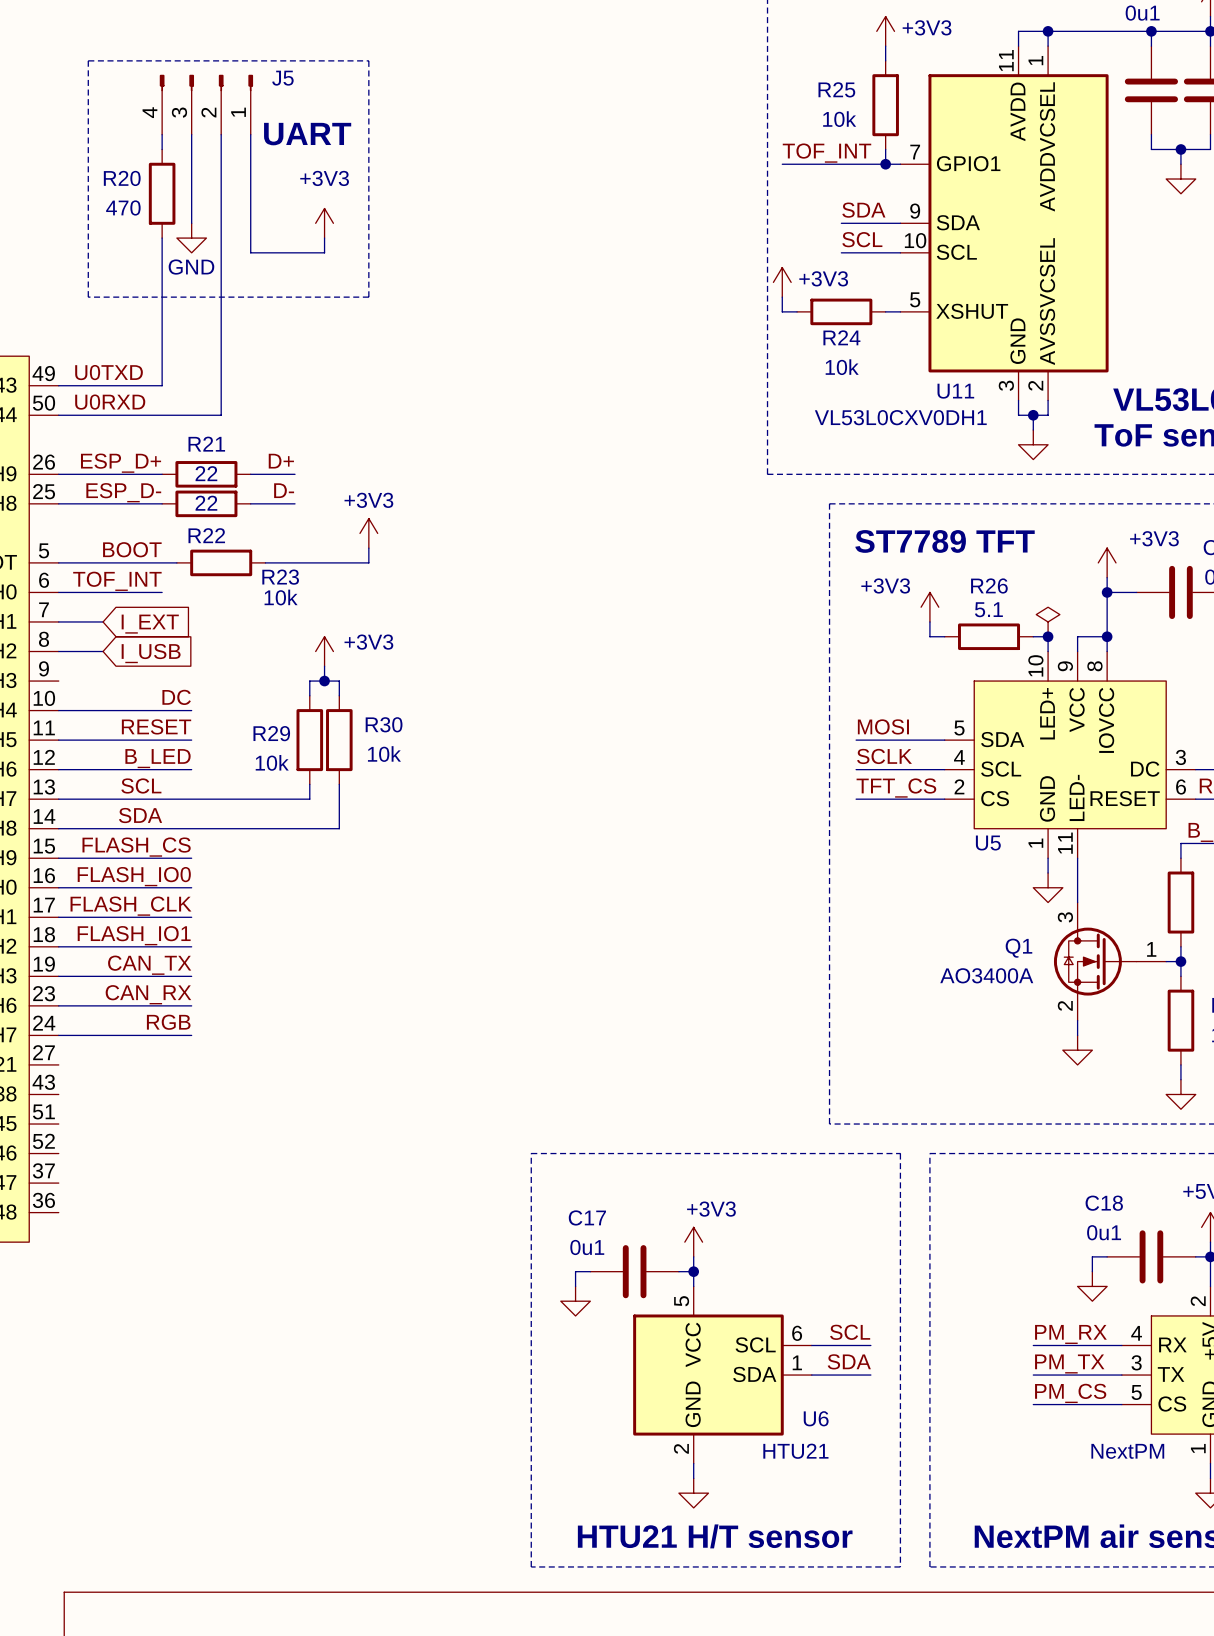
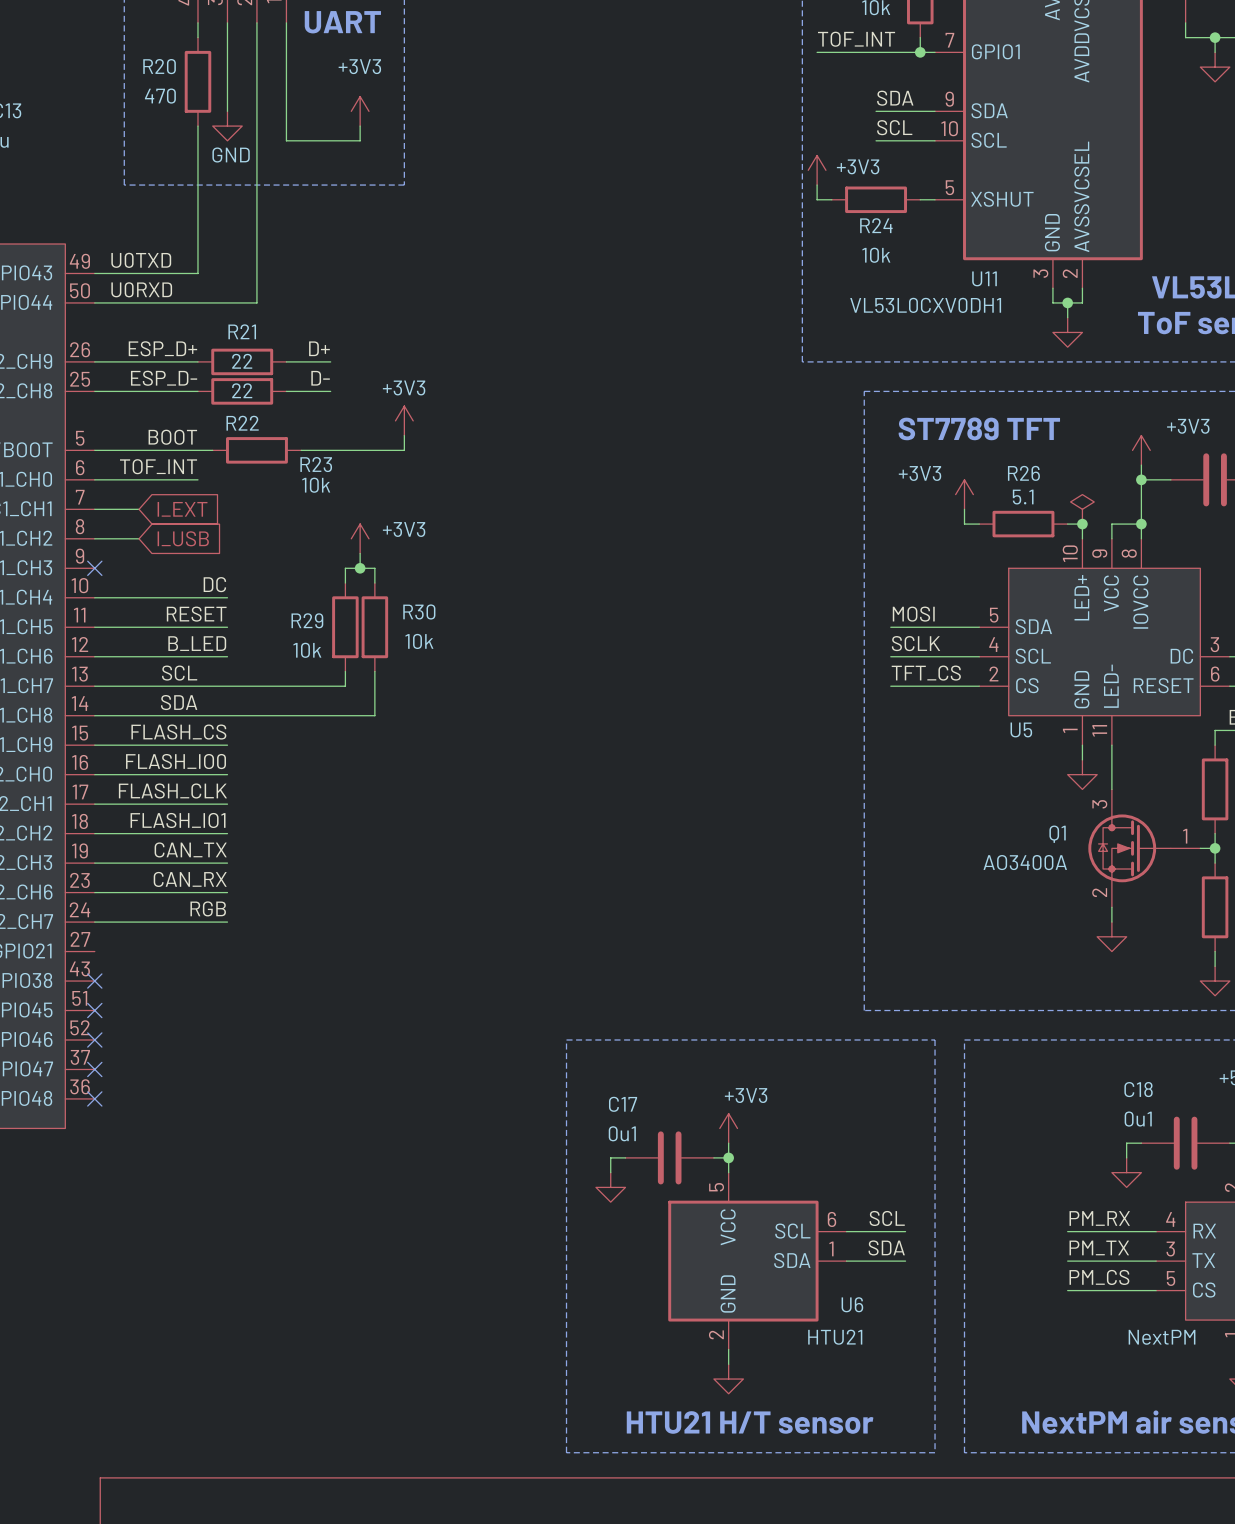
no-connect mark: none -> (94, 568)
no-connect mark: none -> (94, 981)
no-connect mark: none -> (94, 1010)
no-connect mark: none -> (94, 1039)
no-connect mark: none -> (94, 1069)
no-connect mark: none -> (94, 1098)

